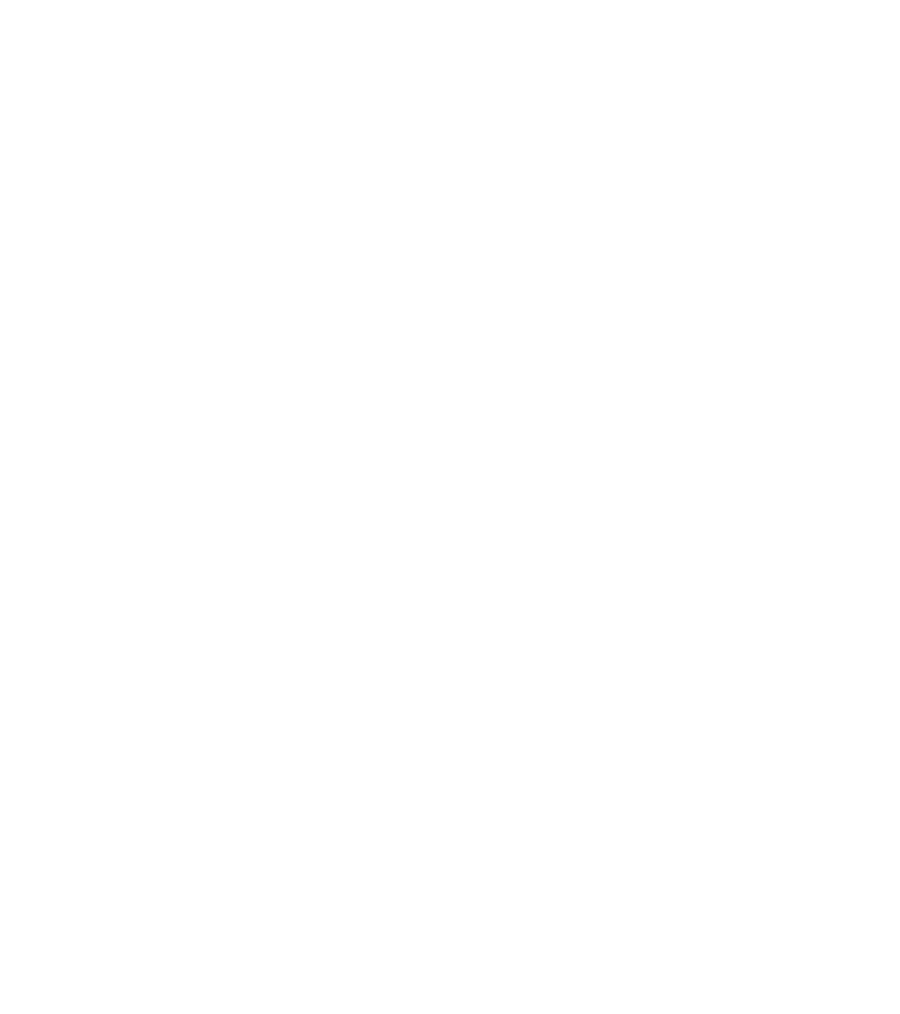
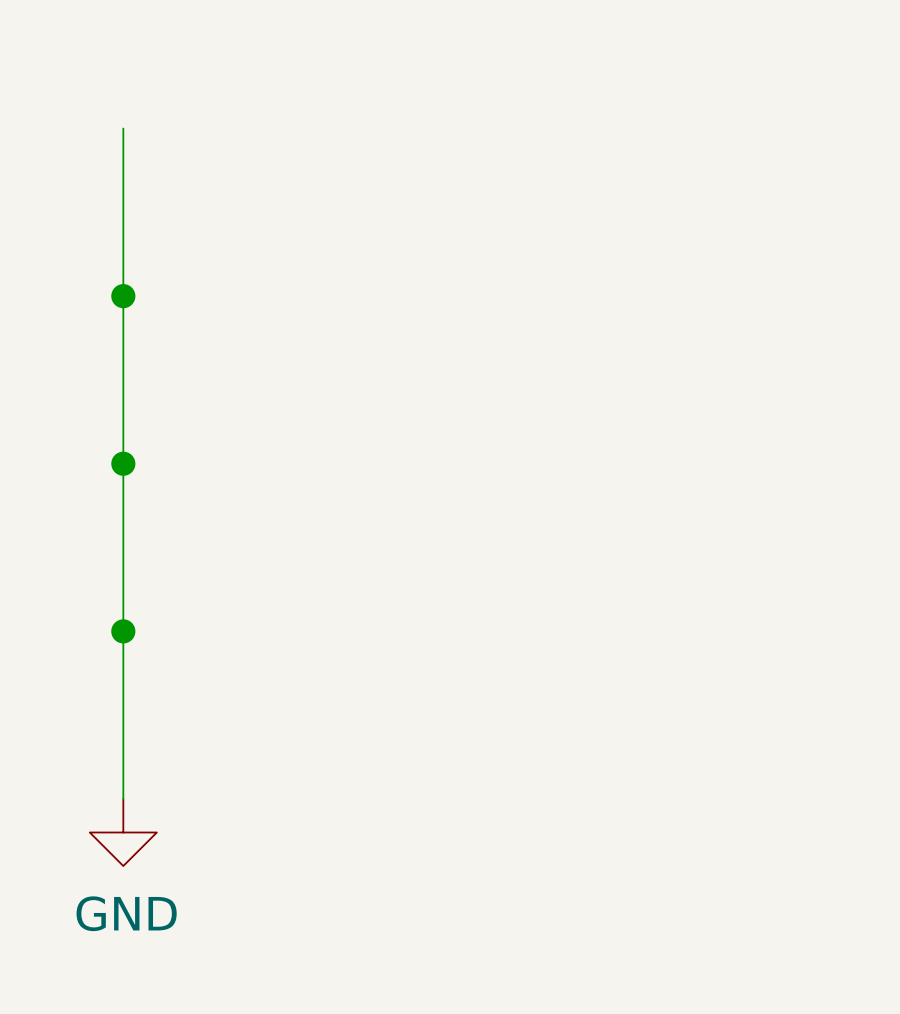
wire: none -> (123, 128) (123, 798)
junction: none -> (123, 296)
junction: none -> (123, 463)
junction: none -> (123, 631)
power symbol: none -> GND (123, 832)

